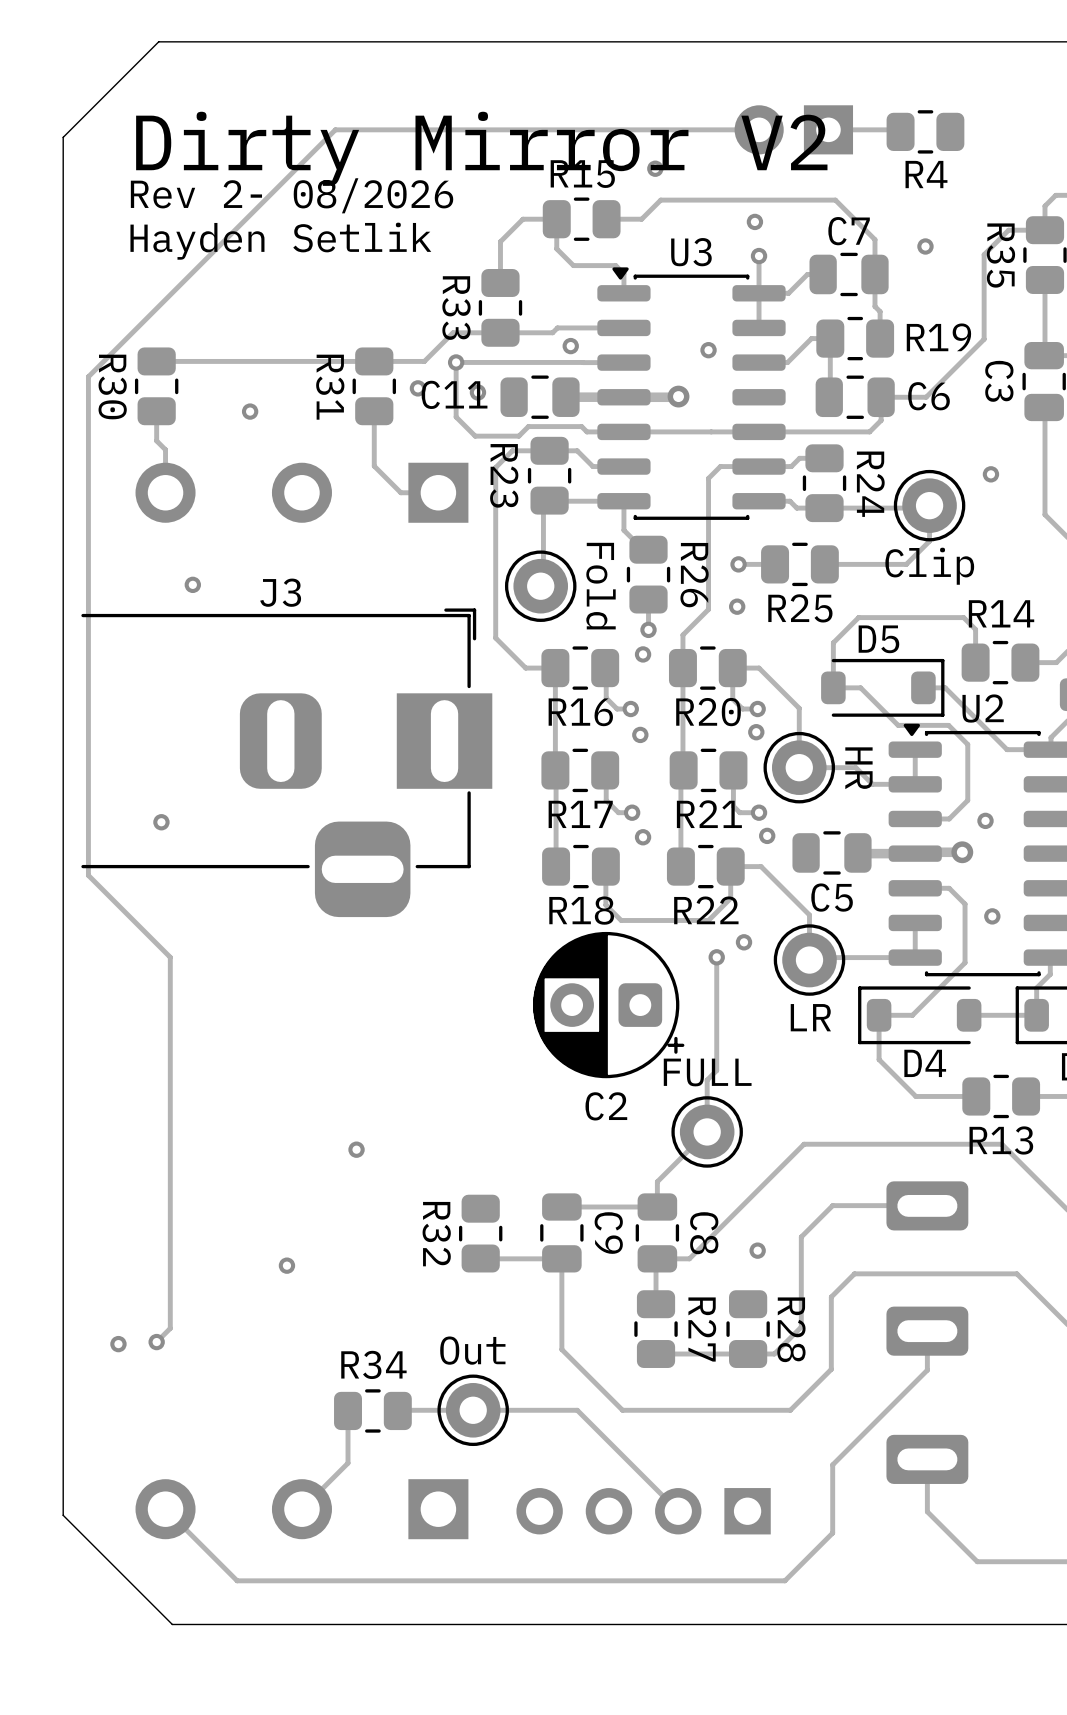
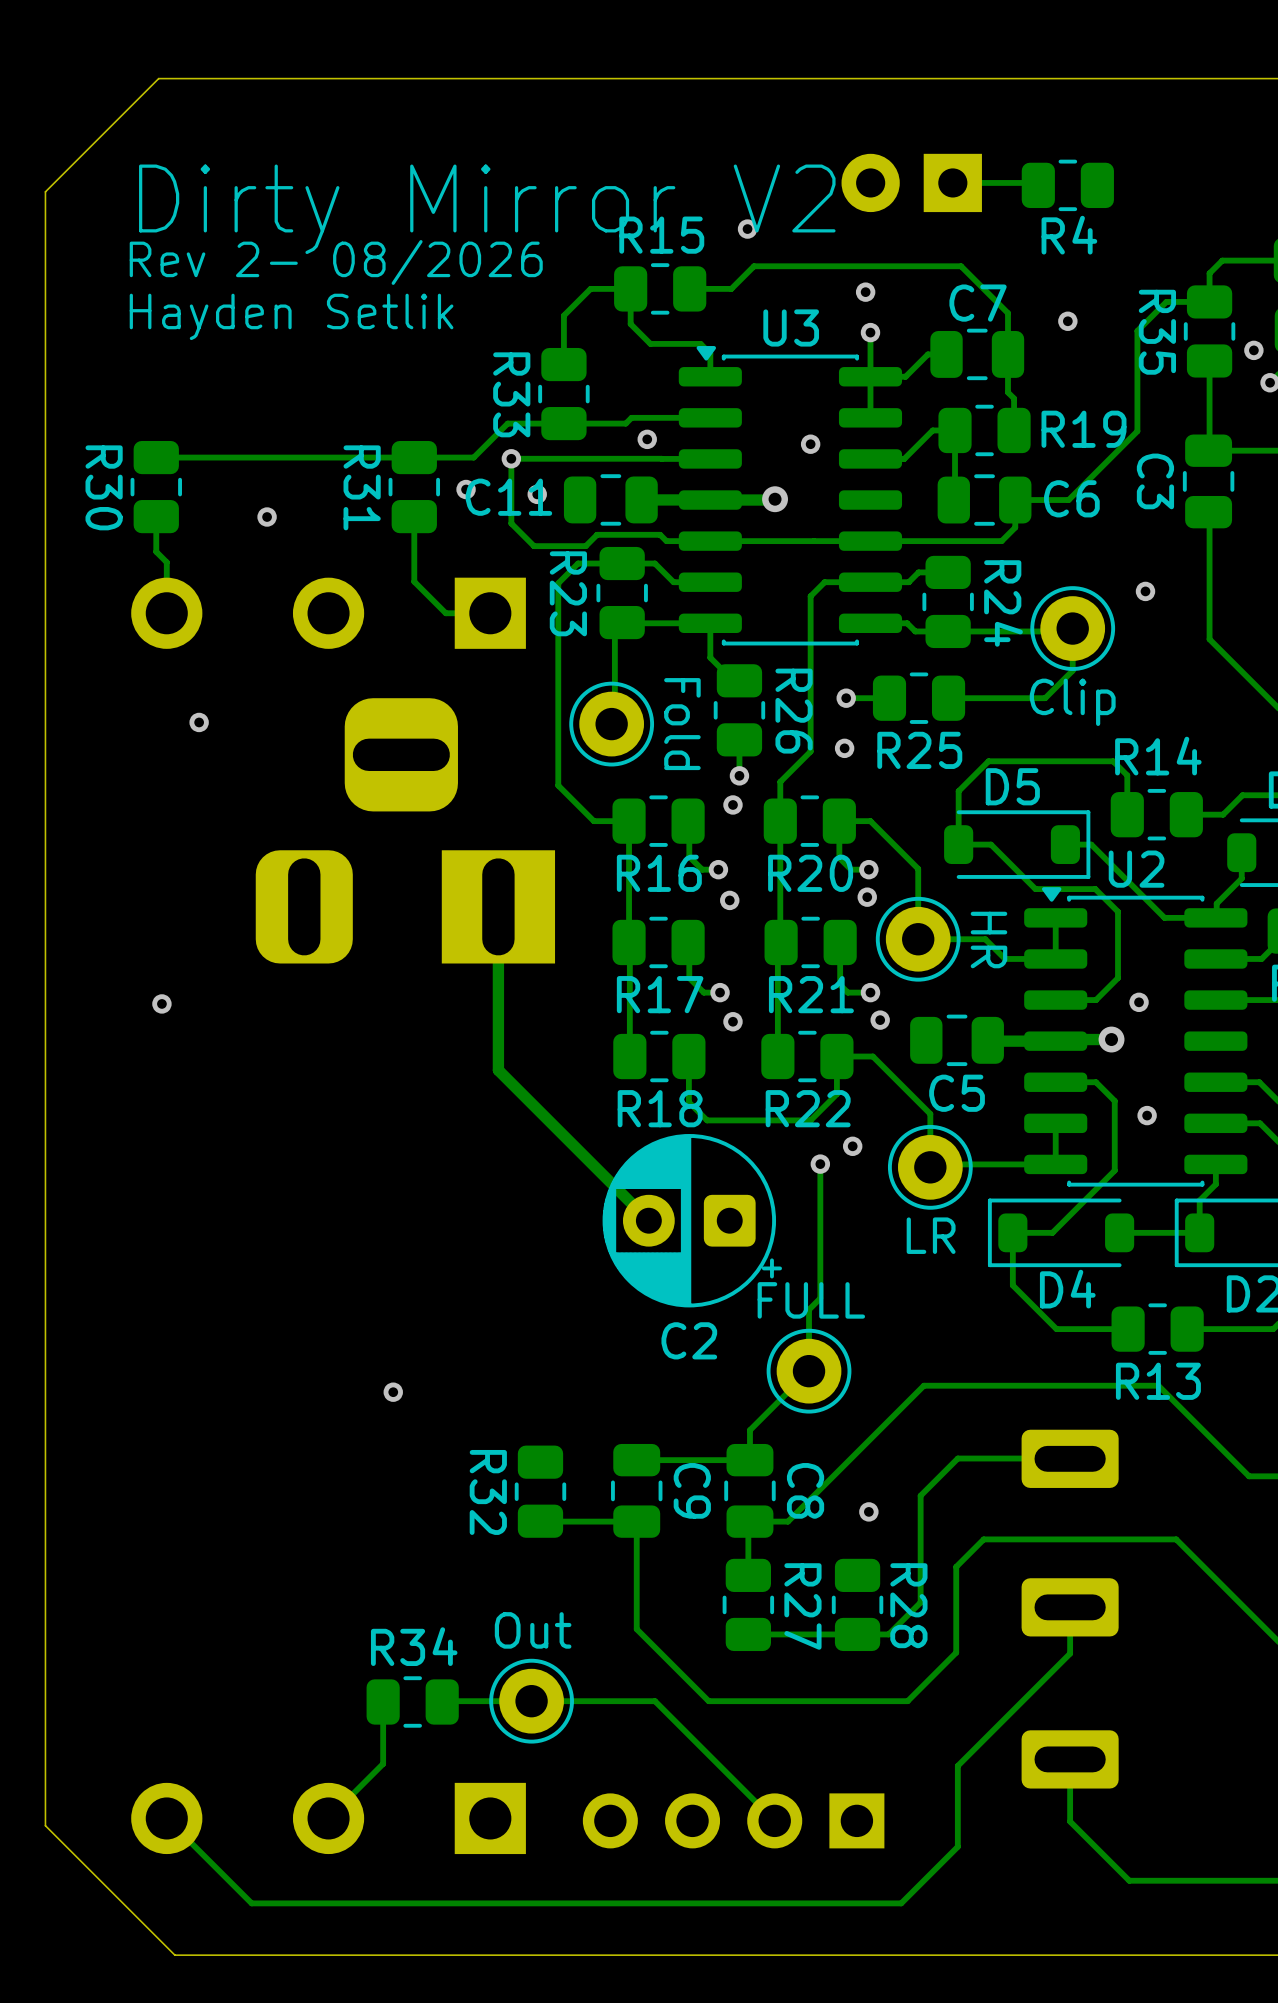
track: (759, 129) (335, 129) (88, 376) (88, 875) (170, 957) (170, 1328) (156, 1342) -> none
track: none -> (498, 906) (498, 1070) (648, 1220)
J3 side: bottom (286, 762) -> top (405, 830)
via: (286, 1265) -> none
via: (156, 1342) -> none
via: (118, 1344) -> none

